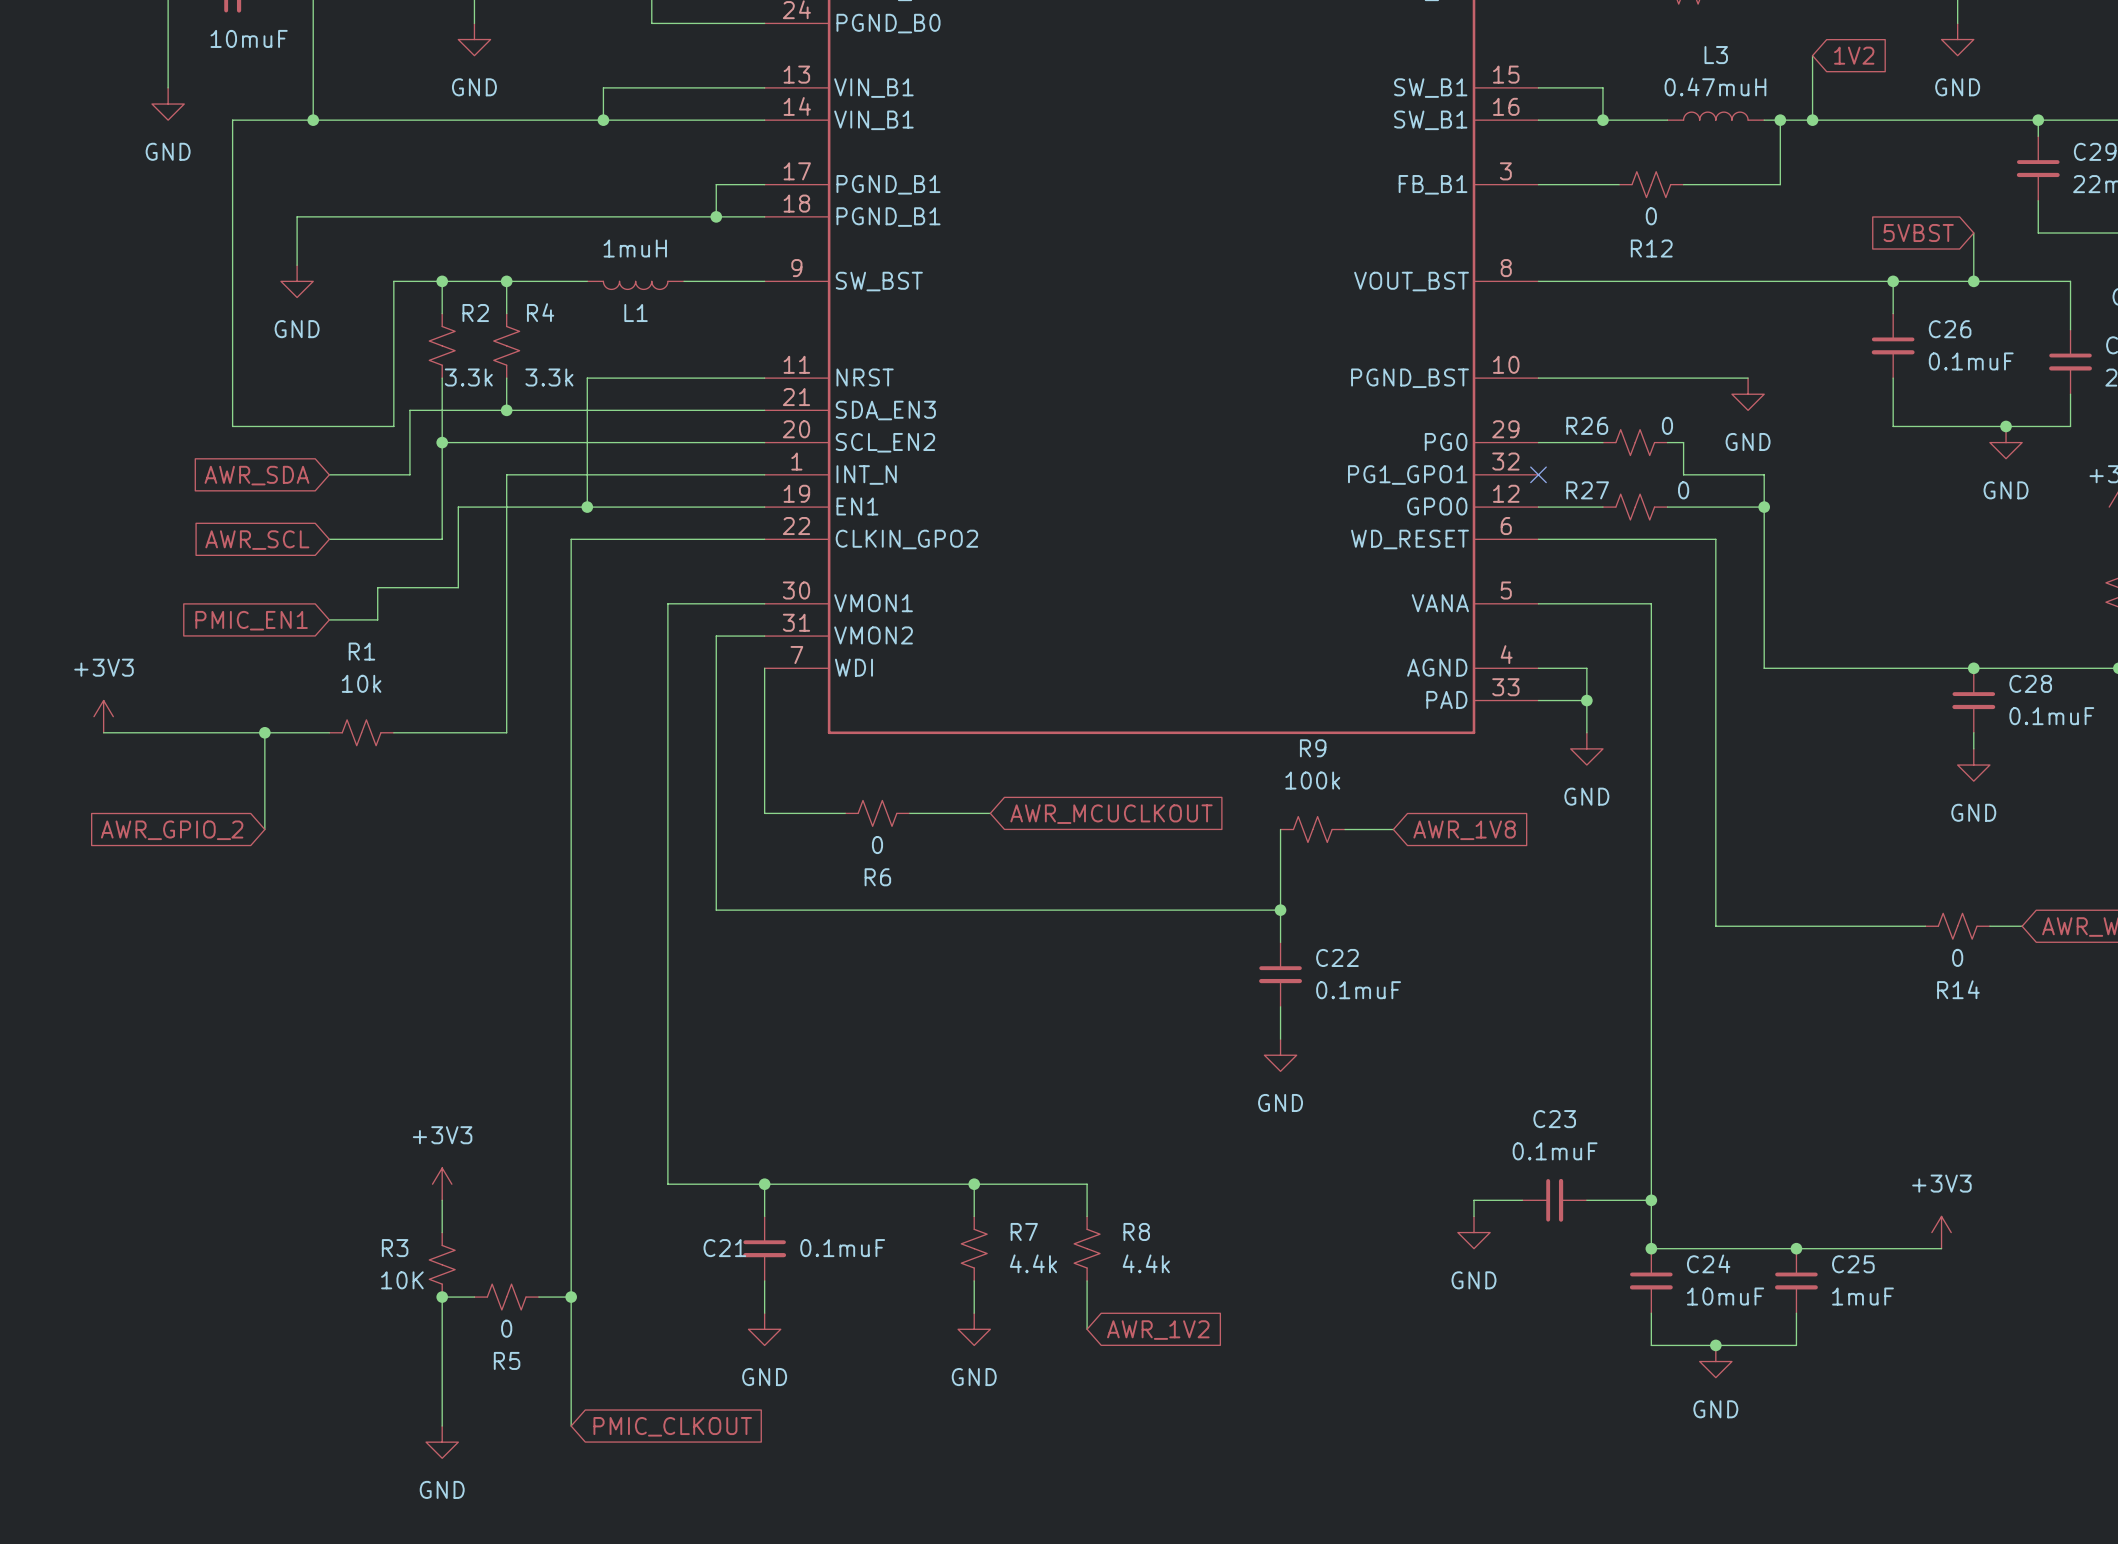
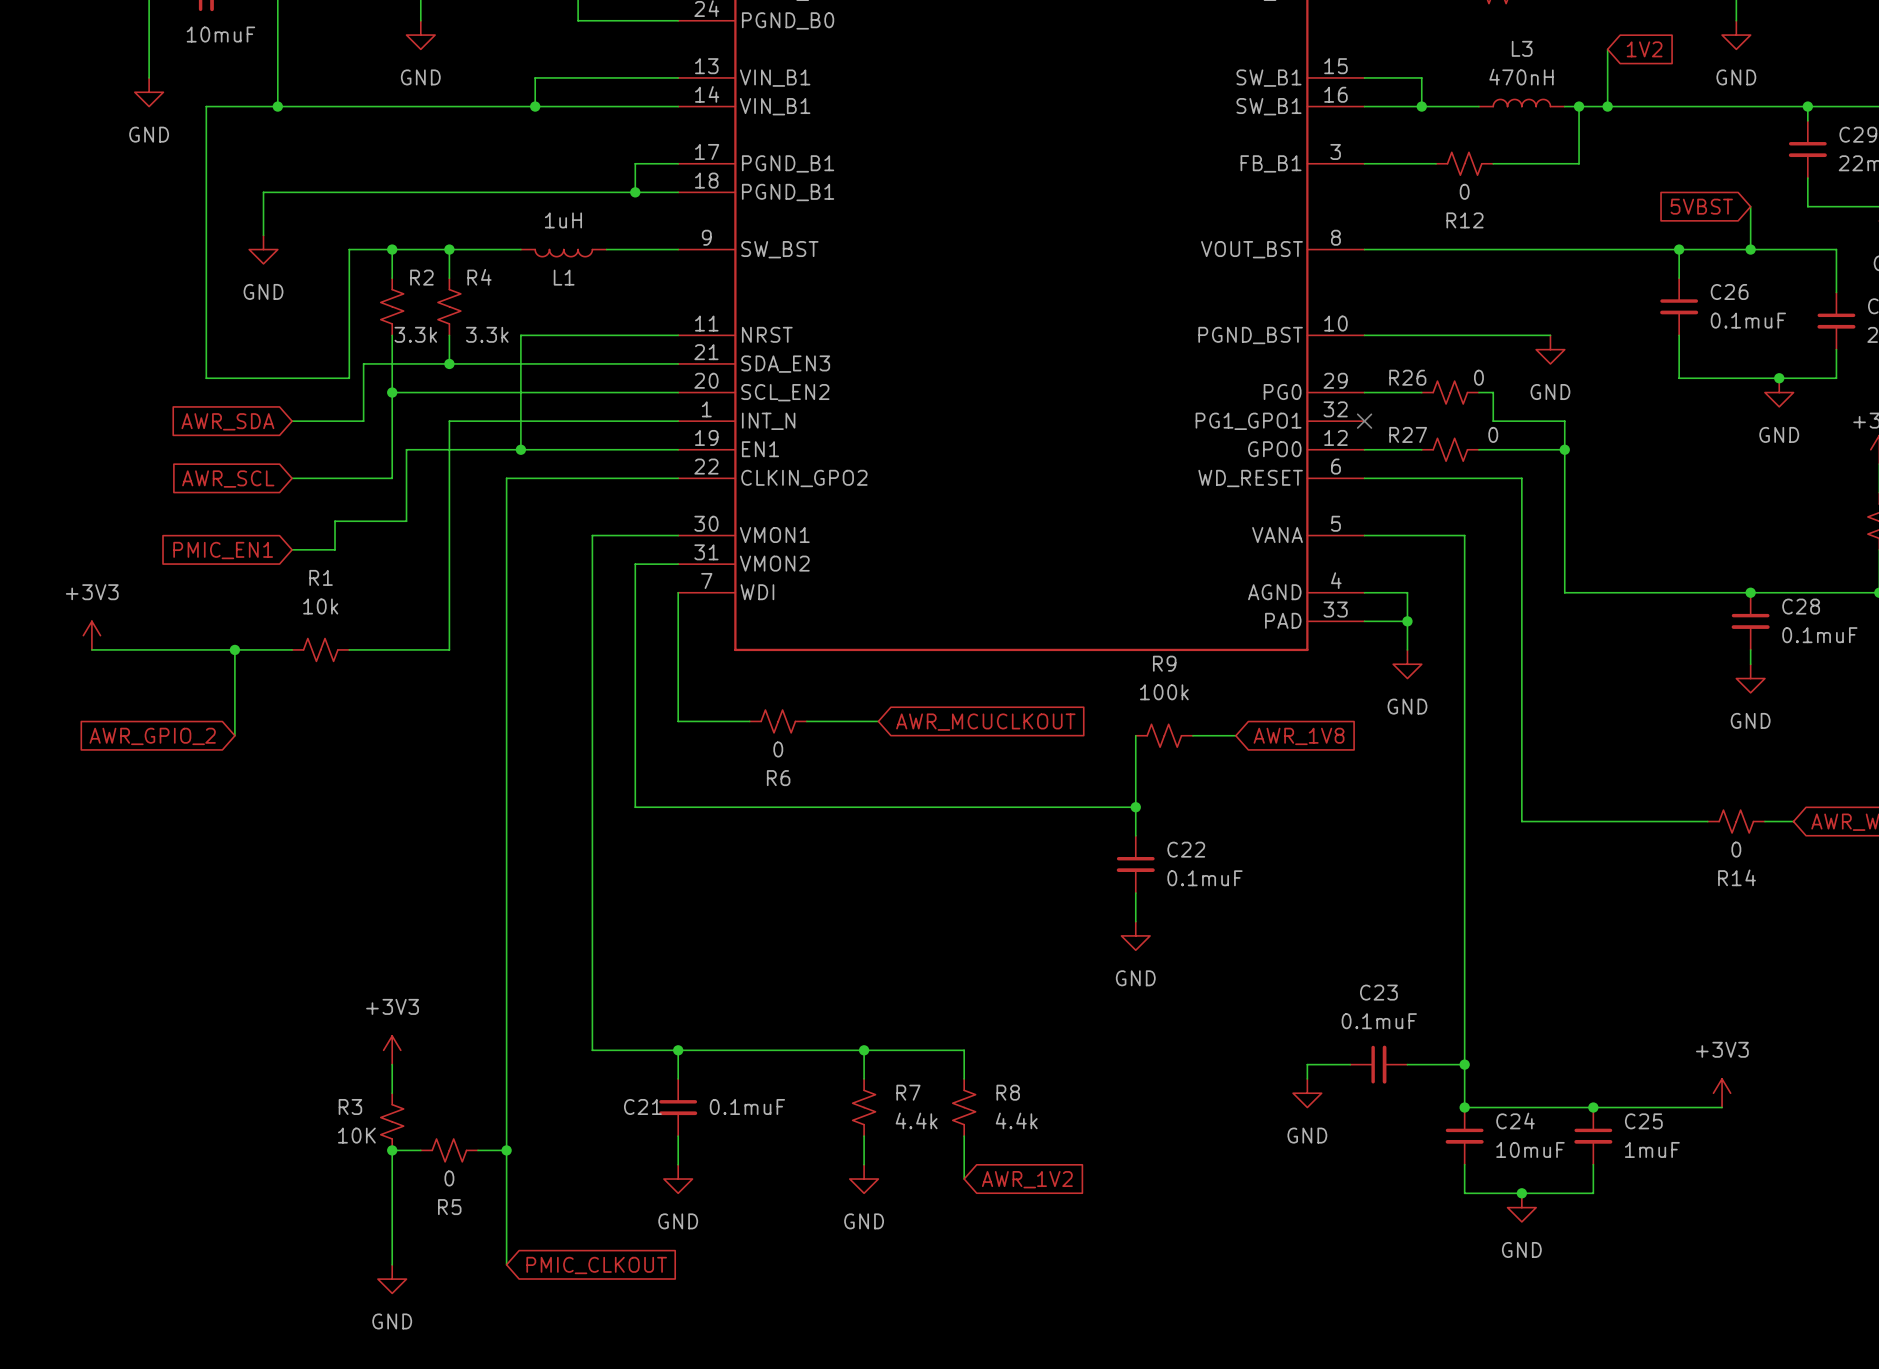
L3 value: 0.47muH (1715, 86) -> 470nH (1521, 77)
L1 value: 1muH (635, 248) -> 1uH (563, 220)

